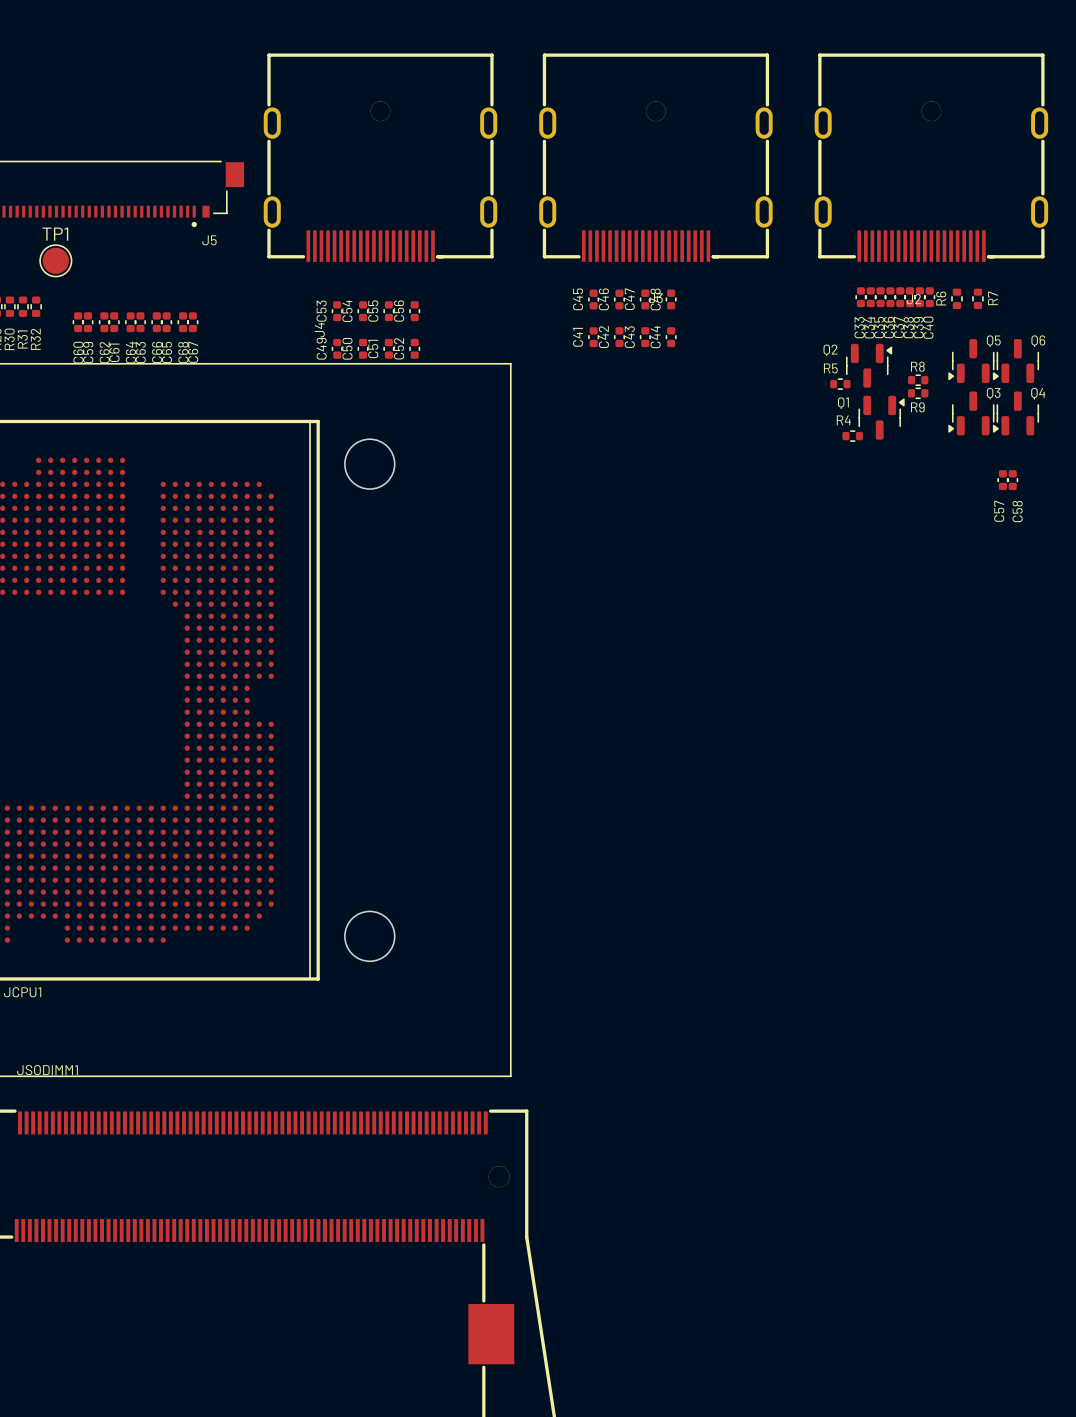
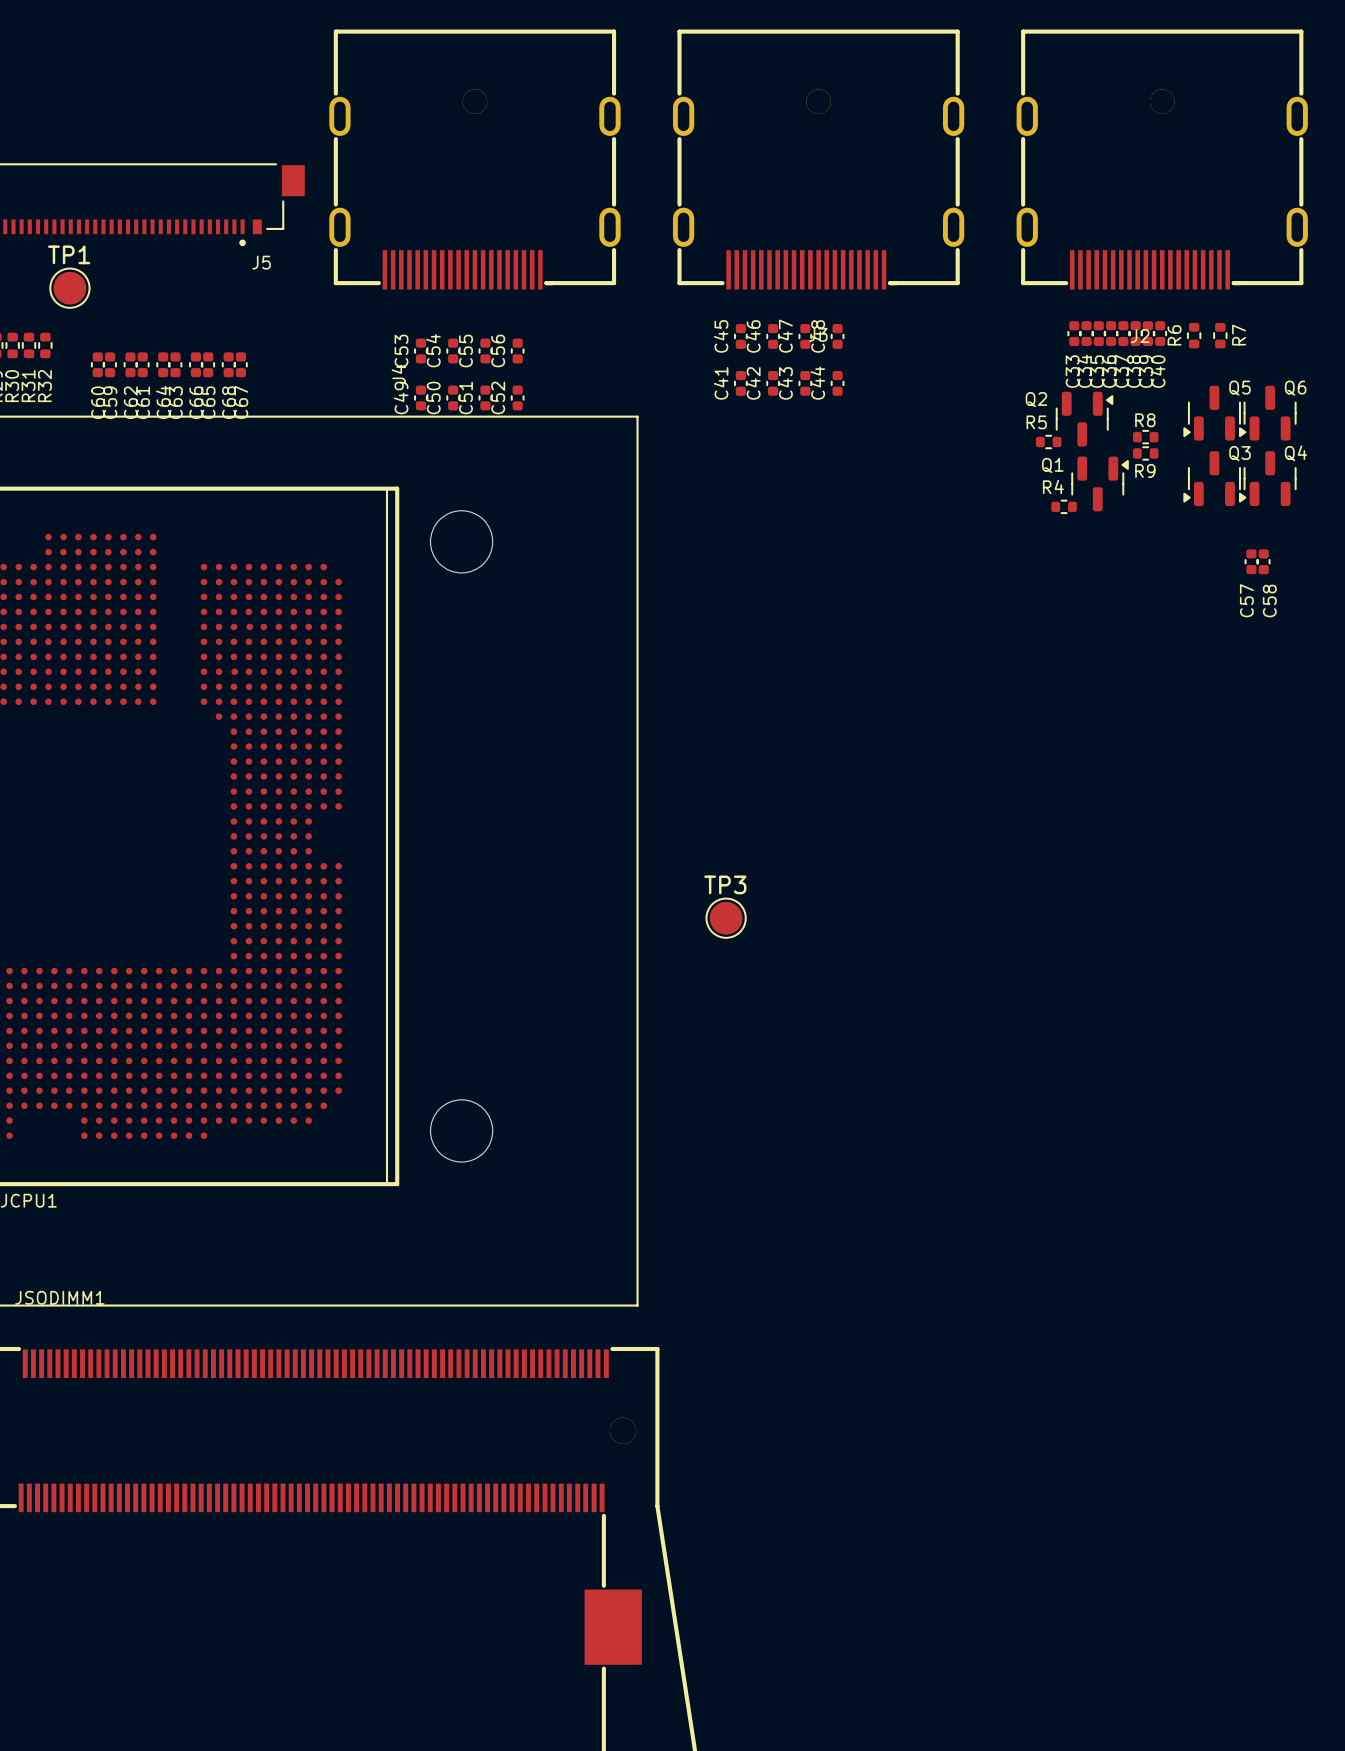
TP3: none -> (726, 918)

